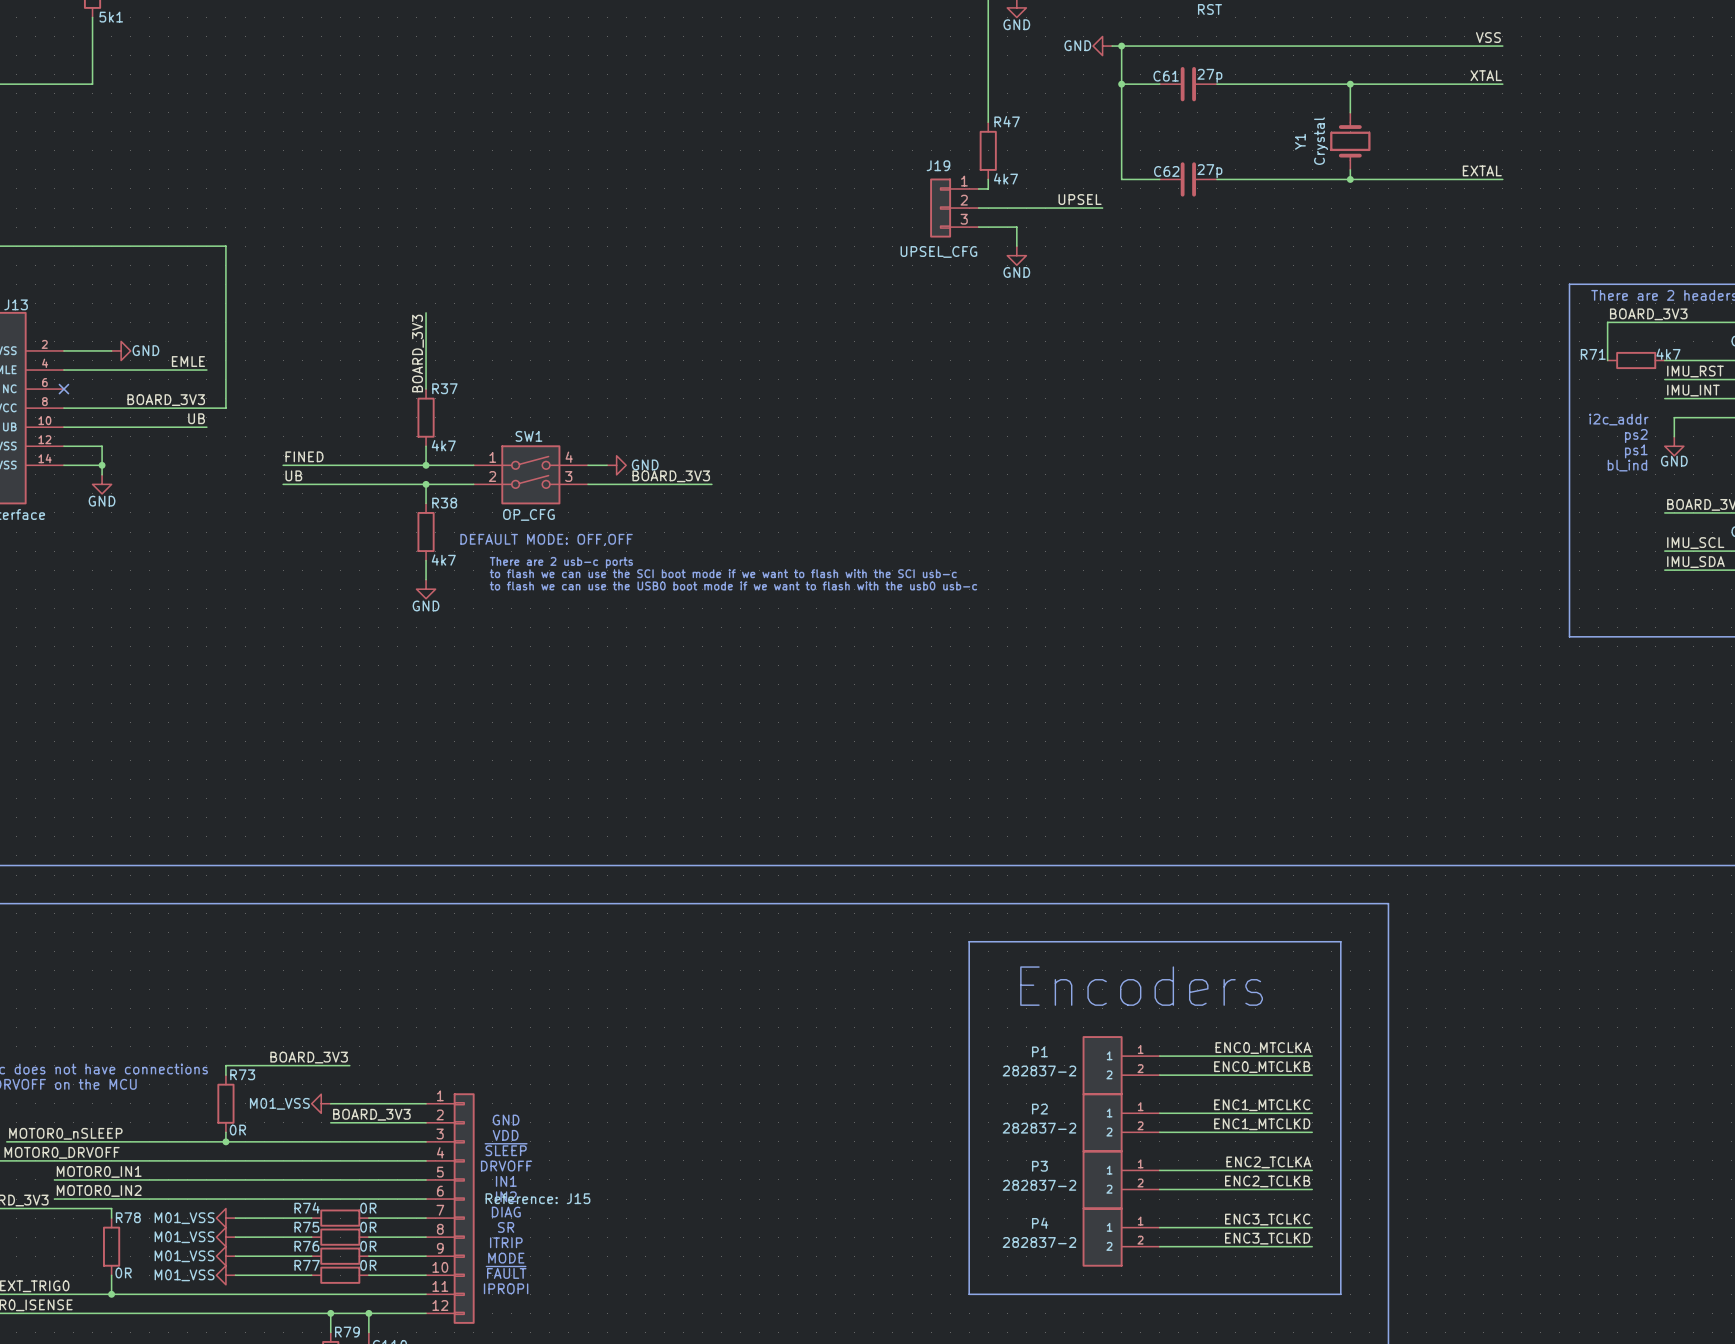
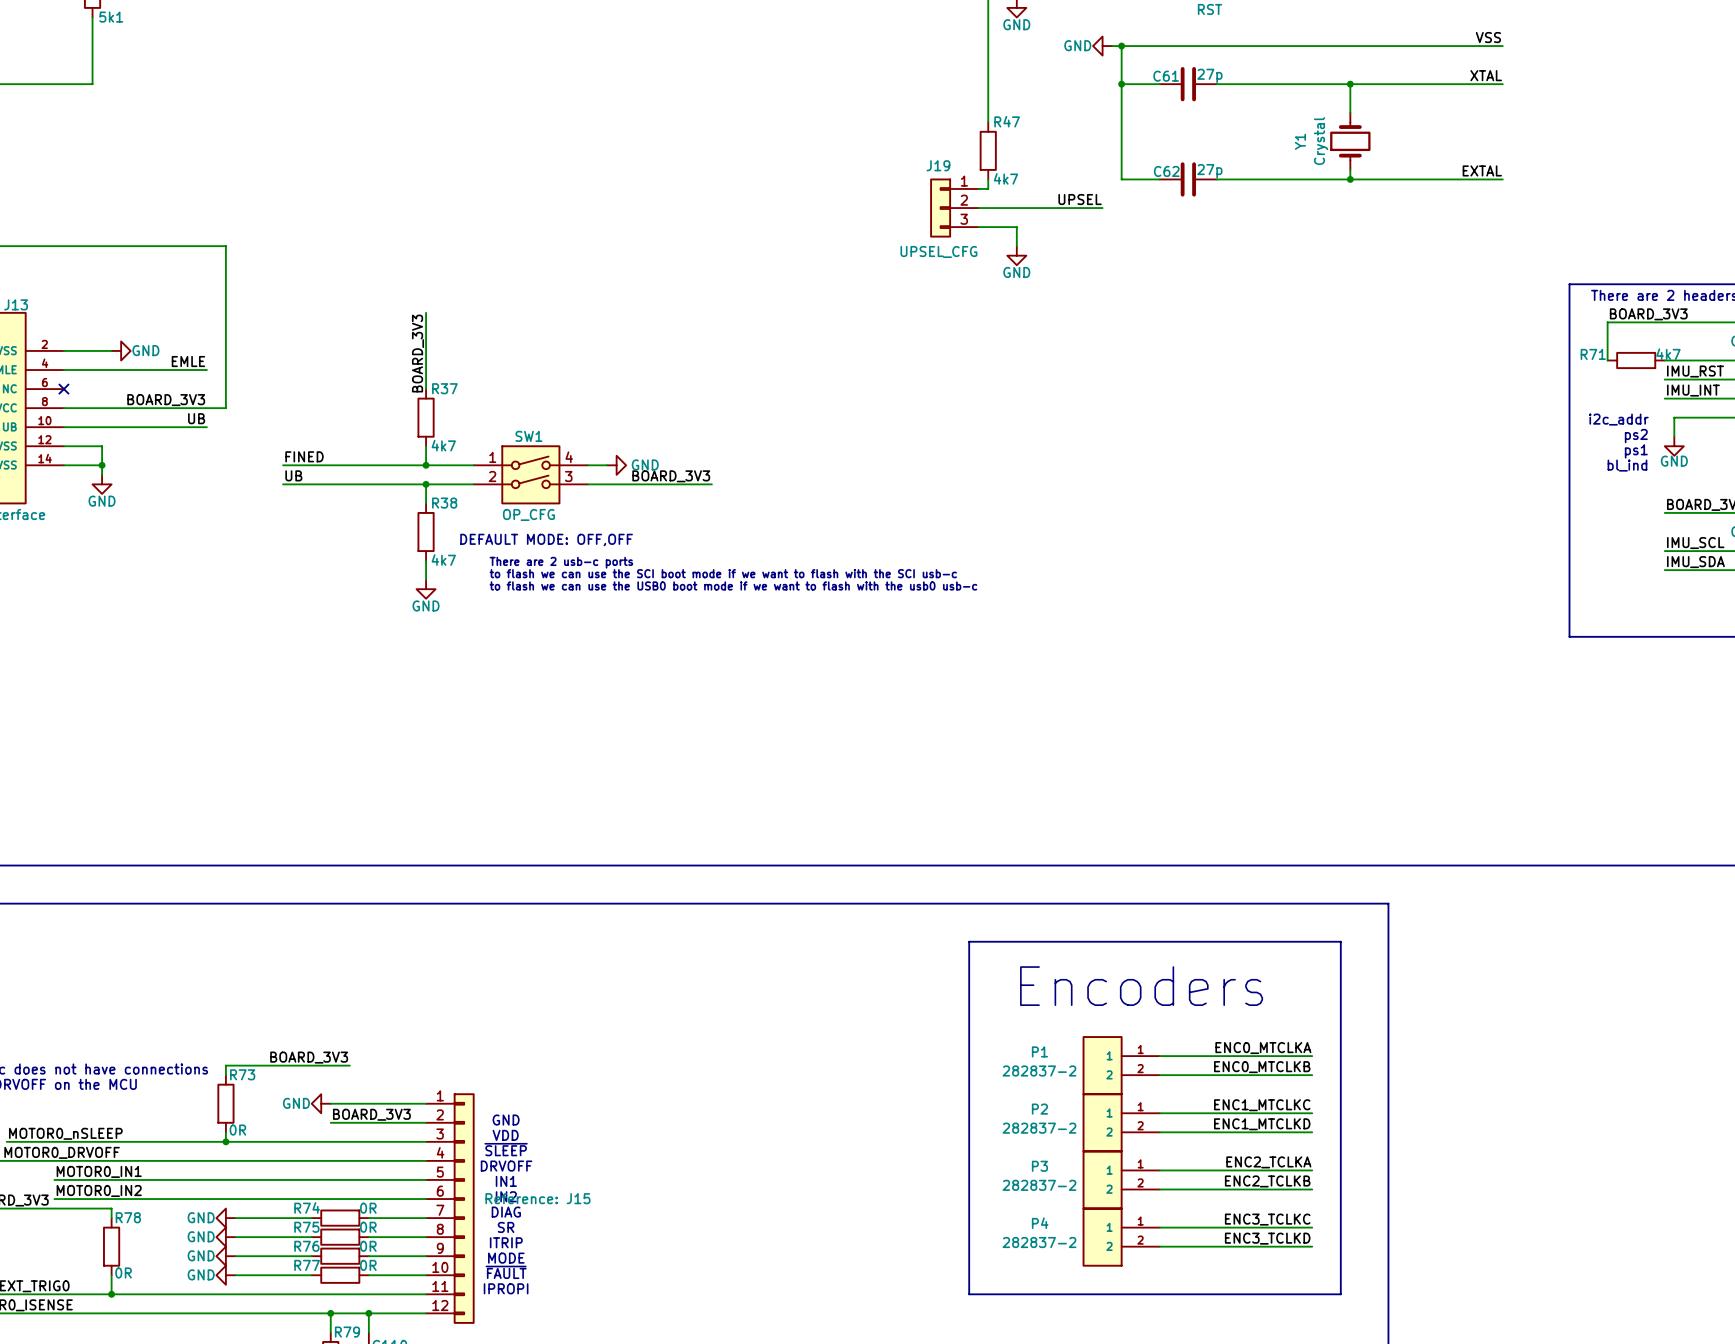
power symbol: M01_VSS (321, 1103) -> GND (321, 1103)
power symbol: M01_VSS (225, 1218) -> GND (225, 1218)
power symbol: M01_VSS (225, 1237) -> GND (225, 1237)
power symbol: M01_VSS (225, 1256) -> GND (225, 1256)
power symbol: M01_VSS (225, 1275) -> GND (225, 1275)

